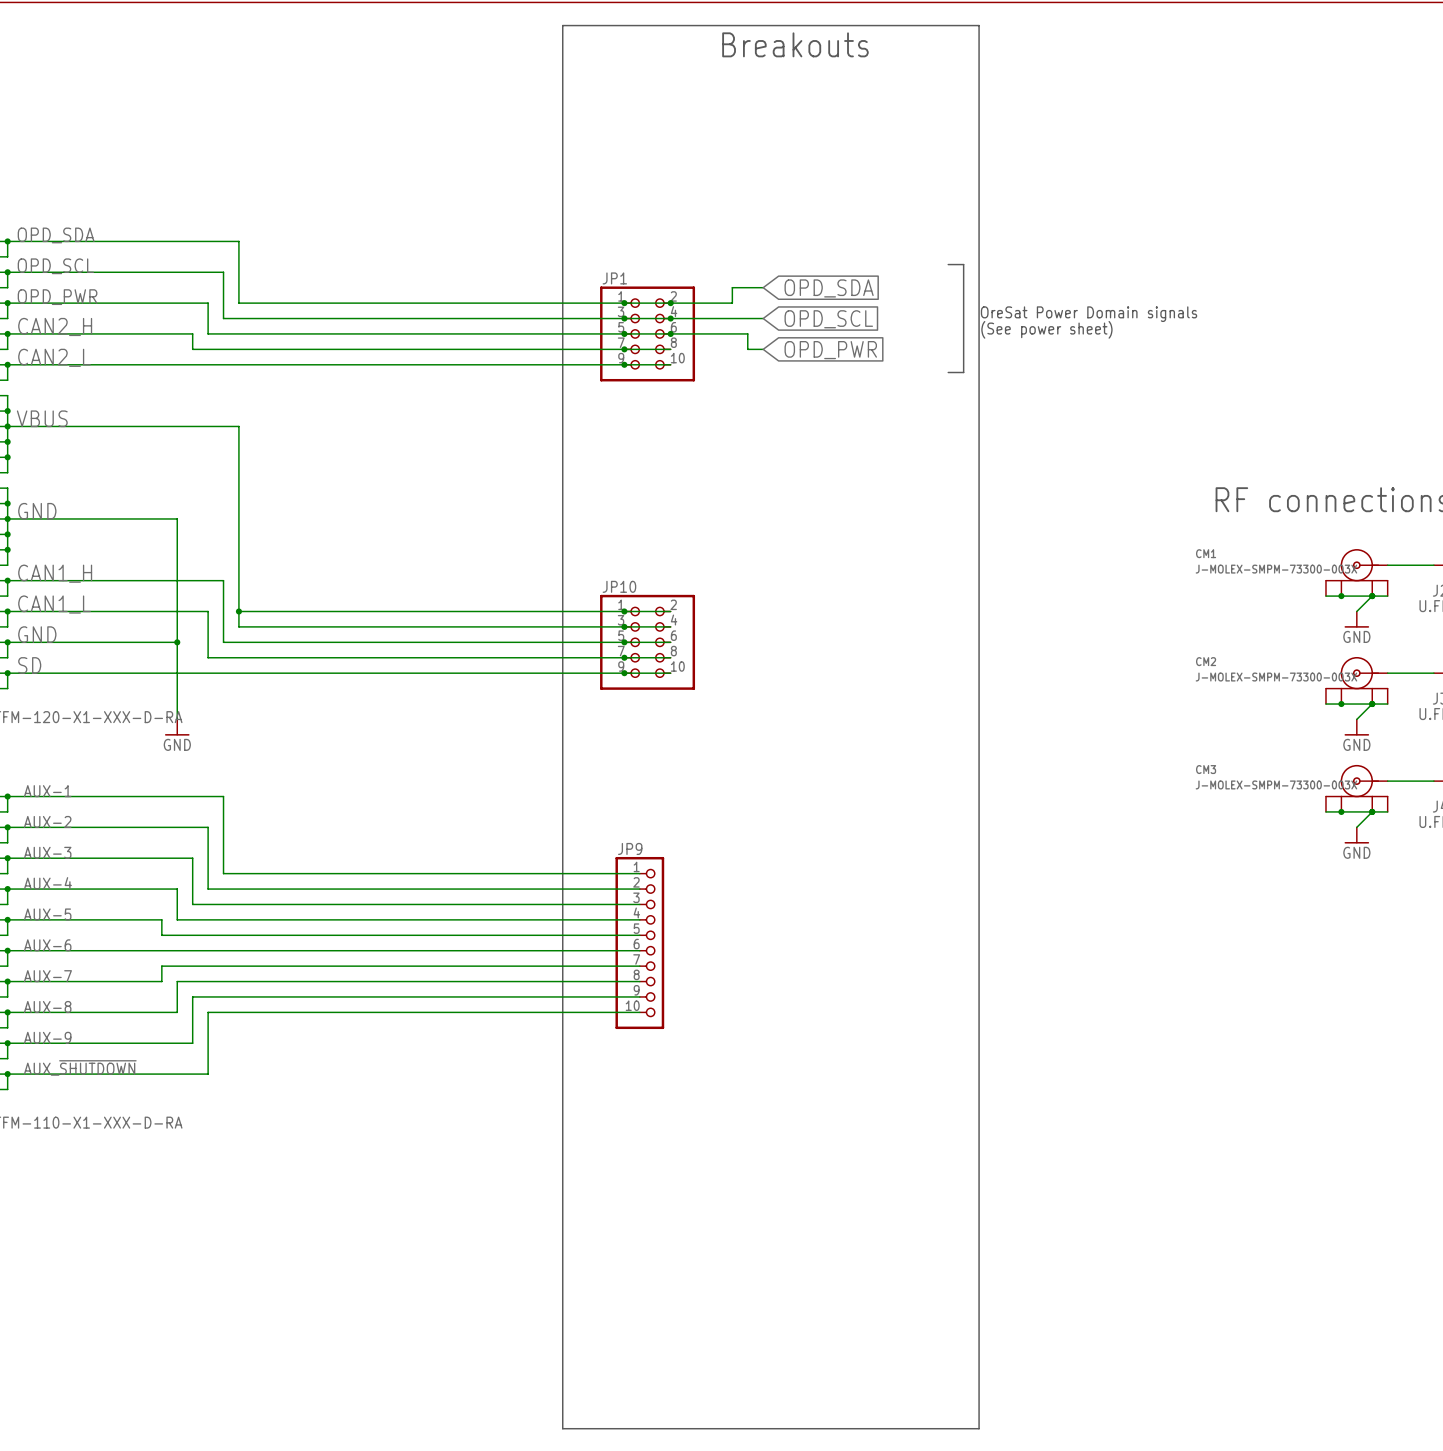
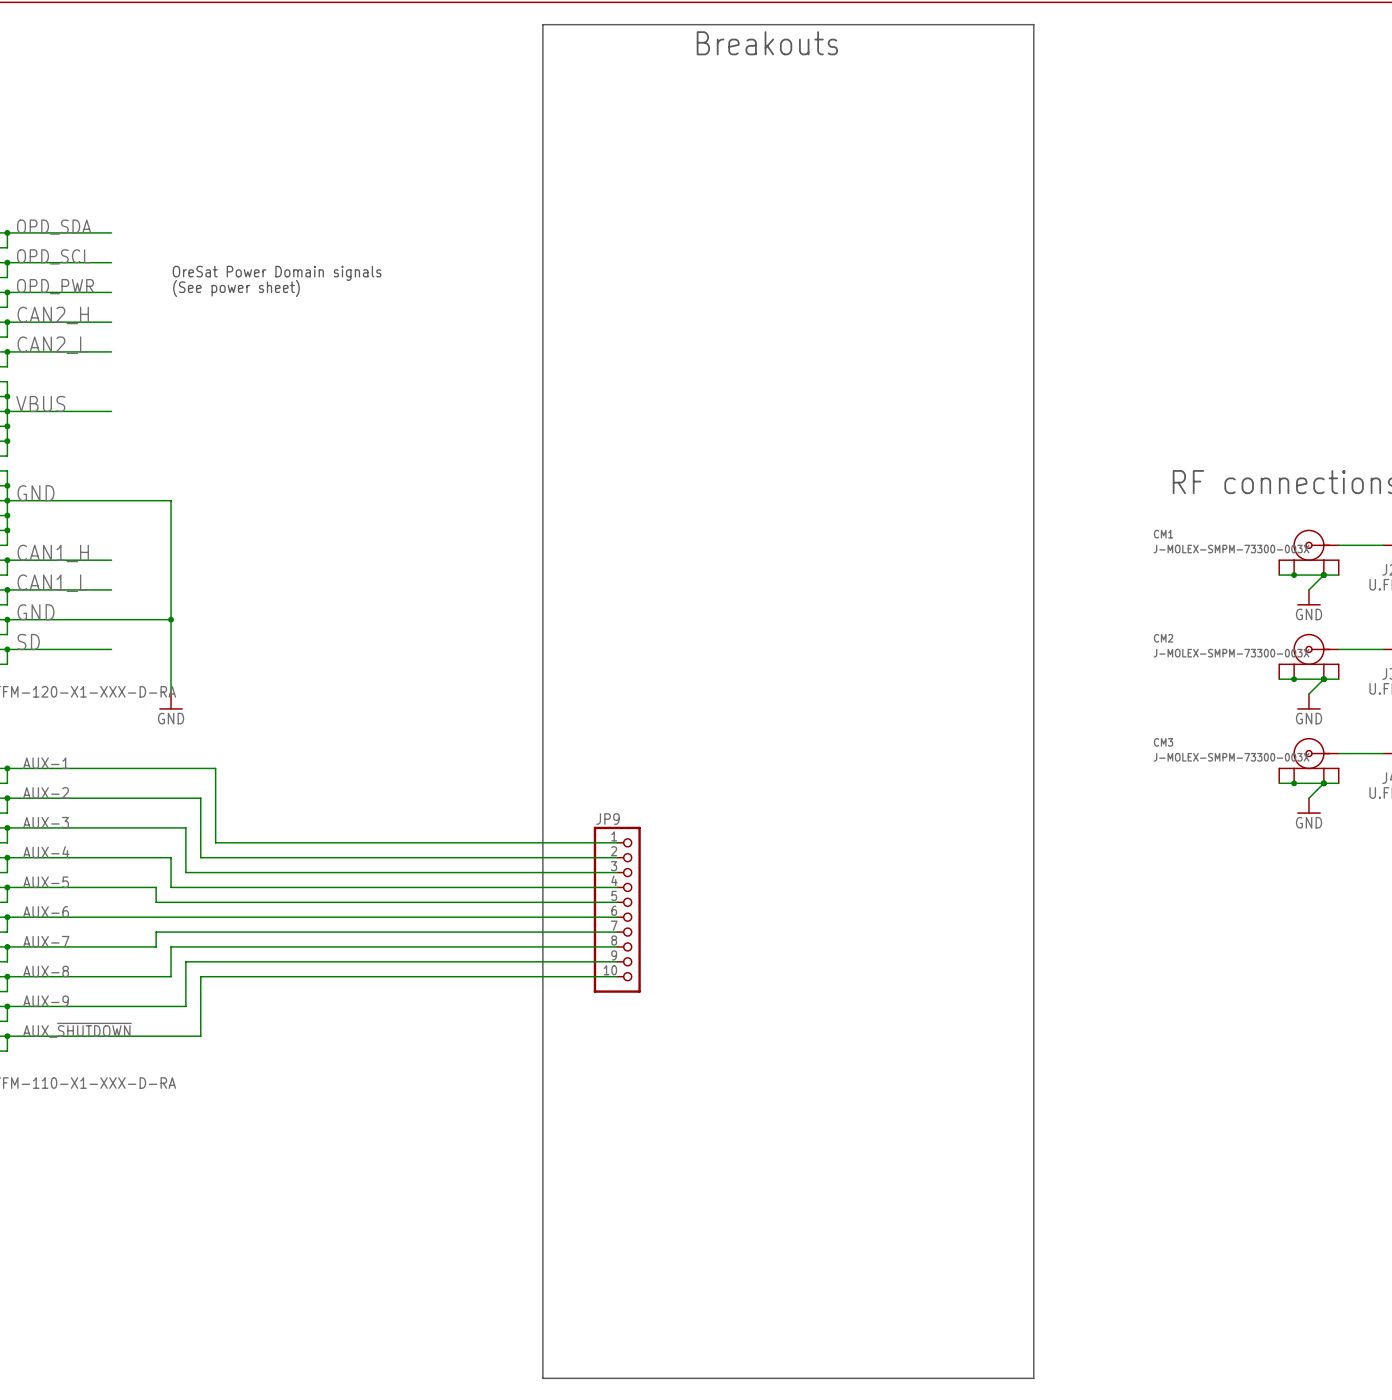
line: (979, 25) (979, 1428) -> (944, 24) (1033, 24) (1033, 1378) (944, 1378)
wire: (115, 241) (238, 241) (238, 303) (732, 303) (732, 287) (763, 287) -> none
line: (948, 264) (963, 264) (963, 372) (948, 372) -> none
wire: (115, 272) (223, 272) (223, 318) (763, 318) -> none
text: none -> OreSat Power Domain signals (277, 273)
global label: OPD_SDA (829, 288) -> none
text: none -> (See power sheet) (236, 288)
wire: (115, 303) (208, 303) (208, 333) (747, 333) (747, 349) (763, 349) -> none
junction: (624, 303) -> none
junction: (670, 303) -> none
text: OreSat Power Domain signals (1089, 314) -> none
junction: (624, 318) -> none
junction: (670, 318) -> none
global label: OPD_SCL (828, 319) -> none
text: (See power sheet) (1046, 329) -> none
wire: (115, 333) (192, 333) (192, 349) (670, 349) -> none
junction: (624, 333) -> none
JP1: (647, 333) -> none
junction: (670, 333) -> none
junction: (624, 349) -> none
global label: OPD_PWR (830, 350) -> none
wire: (115, 364) (670, 364) -> none
junction: (624, 364) -> none
wire: (115, 426) (238, 426) (238, 626) (670, 626) -> none
wire: (115, 580) (223, 580) (223, 642) (670, 642) -> none
wire: (115, 611) (208, 611) (208, 657) (670, 657) -> none
wire: (238, 611) (670, 611) -> none
junction: (238, 611) -> none
junction: (624, 611) -> none
junction: (624, 626) -> none
junction: (624, 642) -> none
JP10: (647, 642) -> none
junction: (624, 657) -> none
wire: (115, 673) (670, 673) -> none
junction: (624, 673) -> none

